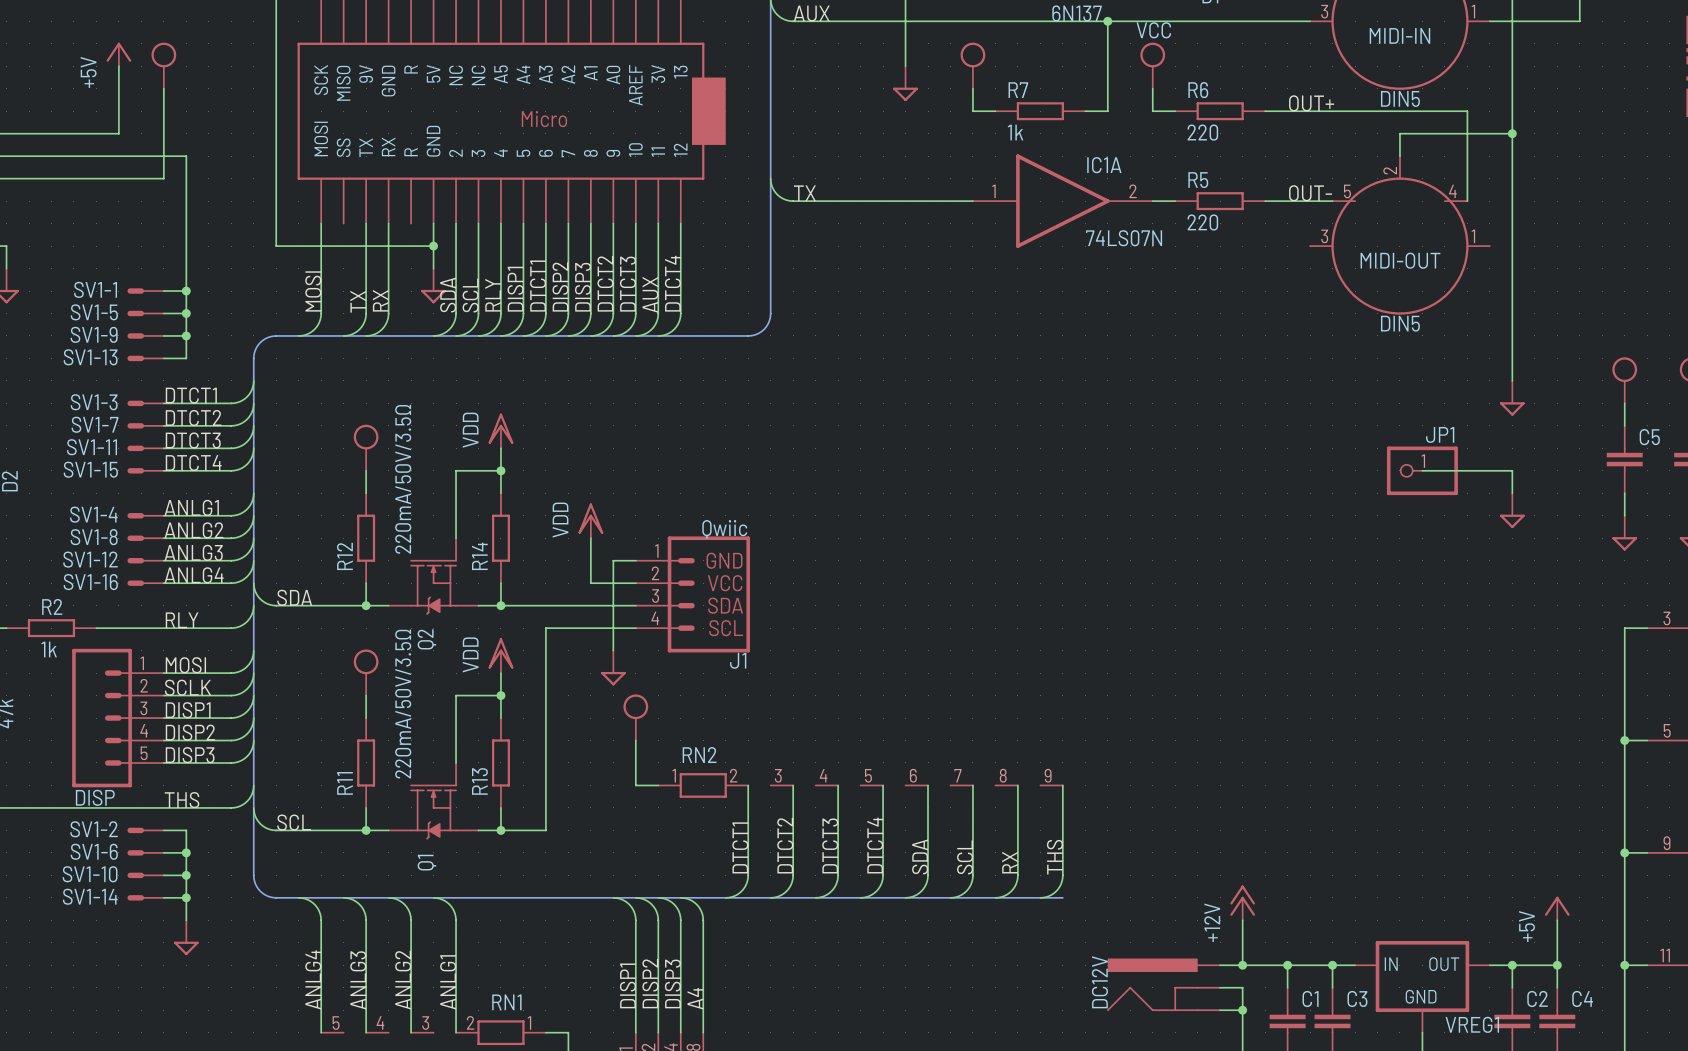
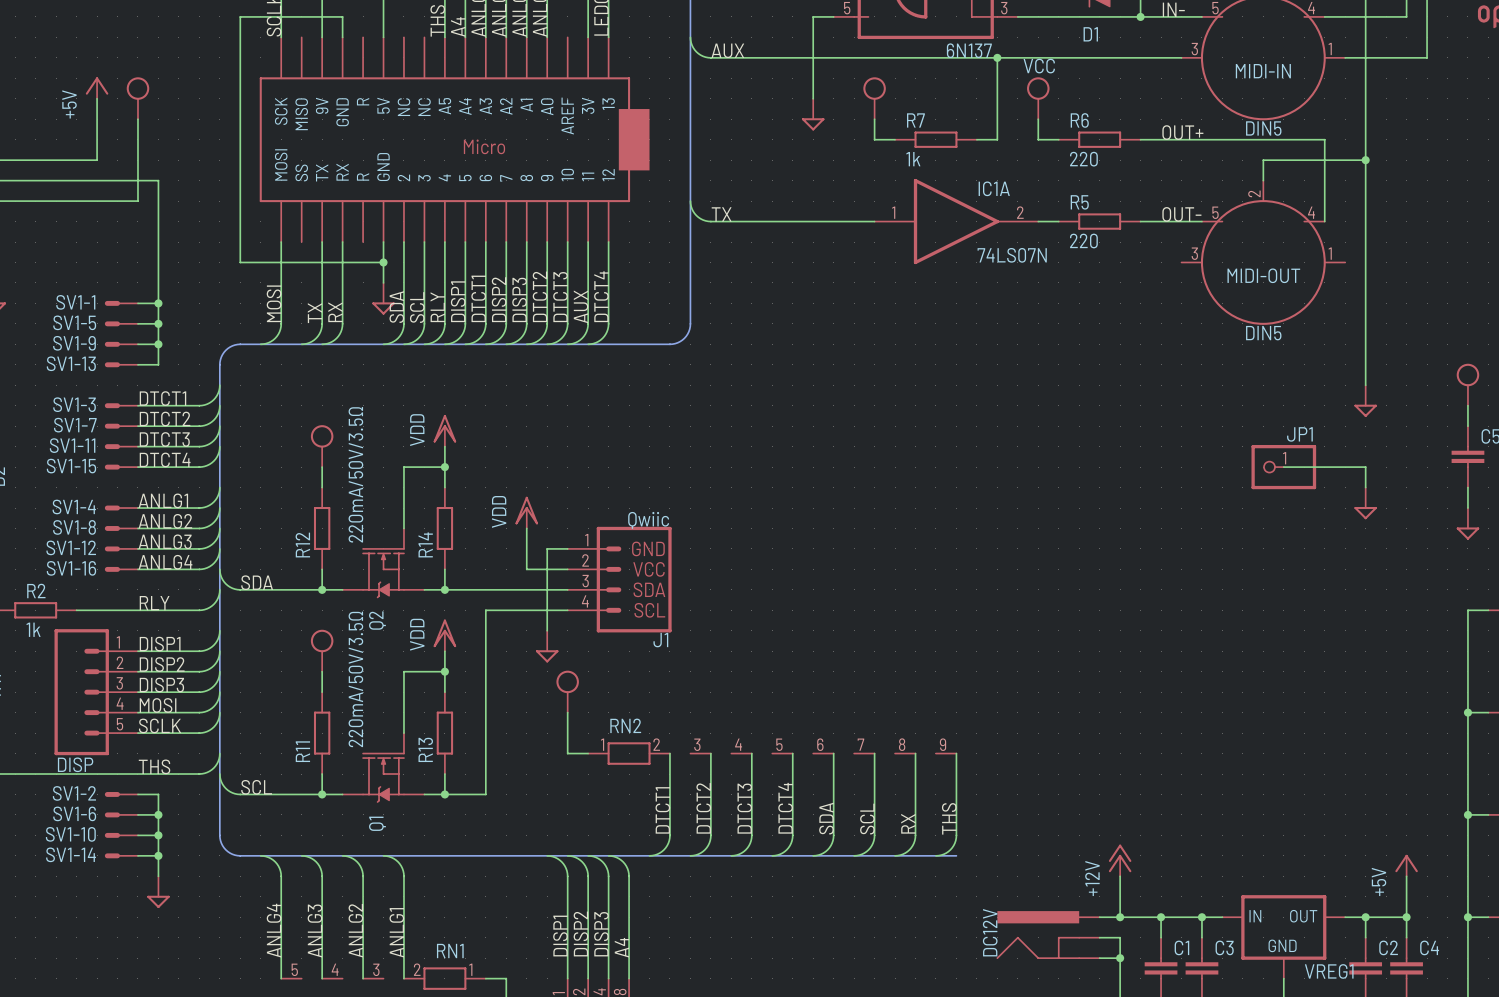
label: MOSI (185, 665) -> DISP1 (160, 644)
label: SCLK (188, 687) -> DISP2 (162, 664)
label: DISP1 (188, 710) -> DISP3 (161, 685)
label: DISP2 (190, 732) -> MOSI (158, 705)
label: DISP3 (190, 755) -> SCLK (160, 725)

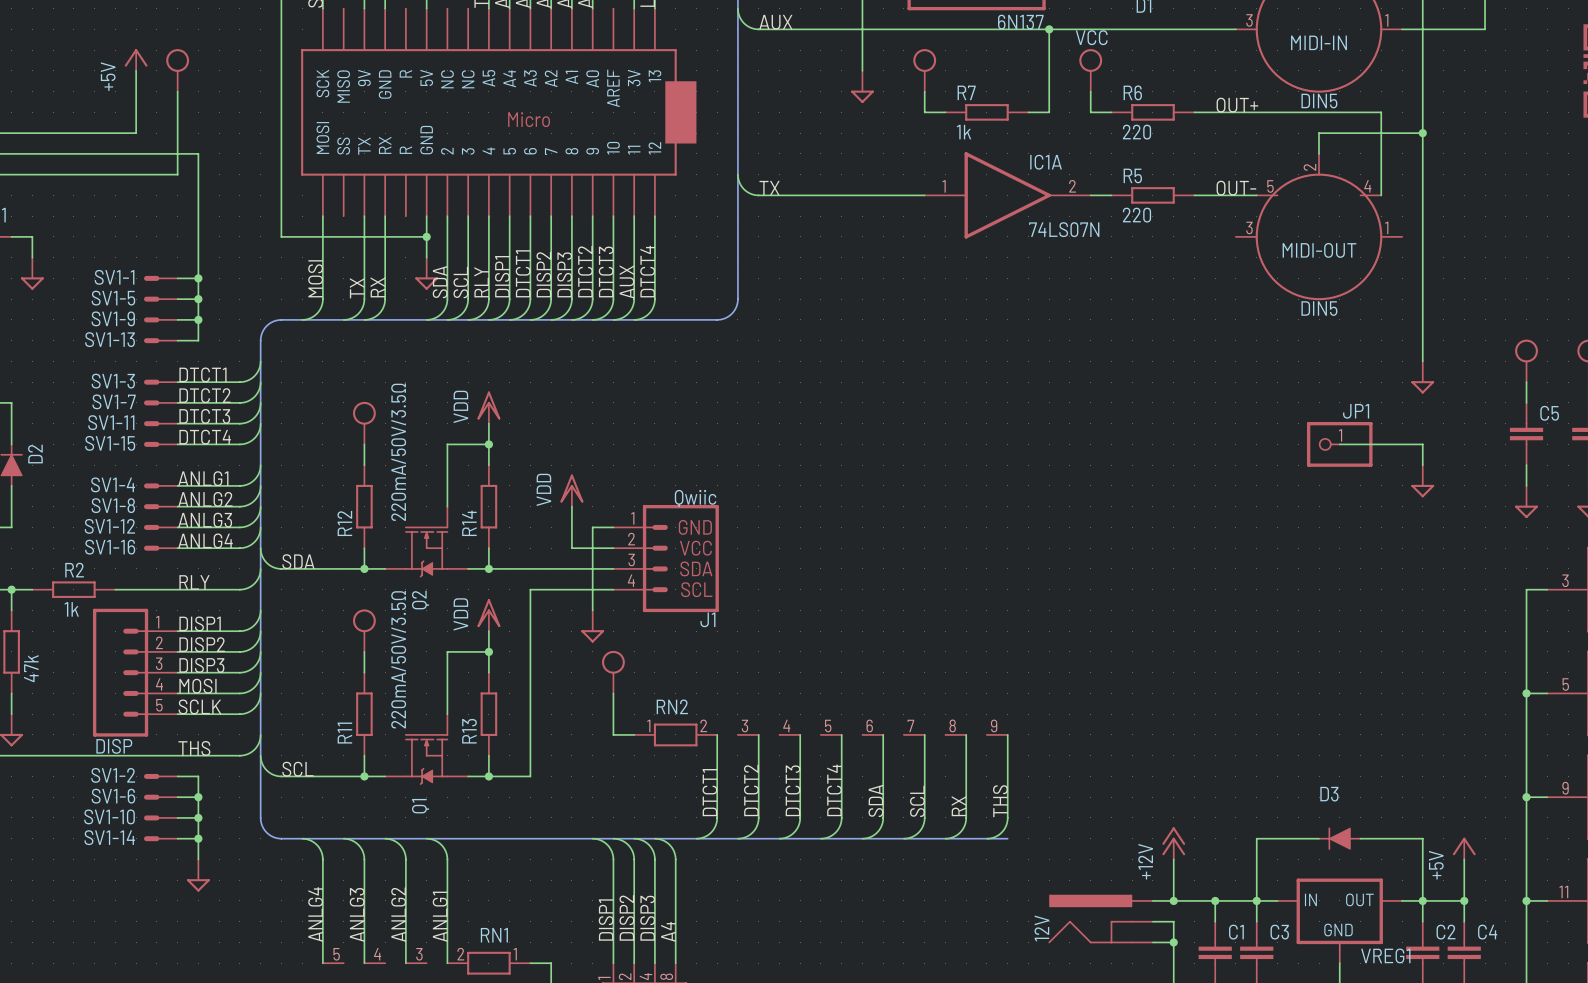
wire: none -> (1319, 838) (1256, 838) (1256, 900)
D3: none -> (1339, 838)
wire: none -> (1360, 838) (1422, 838) (1422, 900)
DC12V name: DC12V (990, 932) -> 12V (1041, 928)

